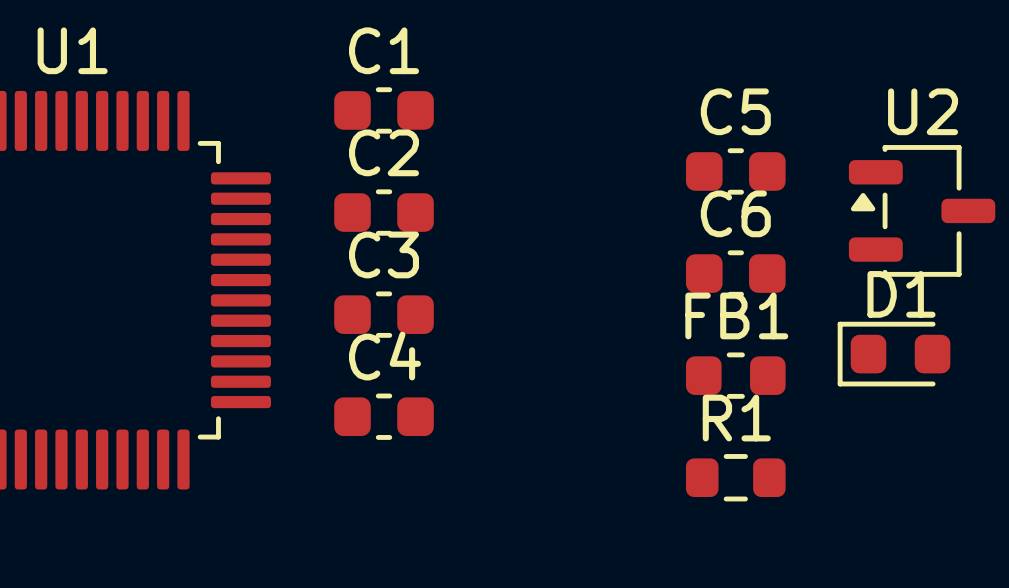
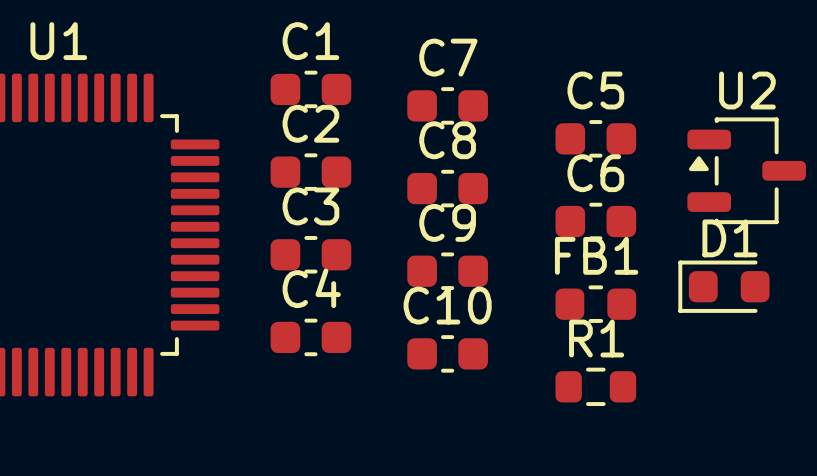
C7: none -> (447, 105)
C8: none -> (447, 188)
C9: none -> (447, 271)
C10: none -> (447, 353)

